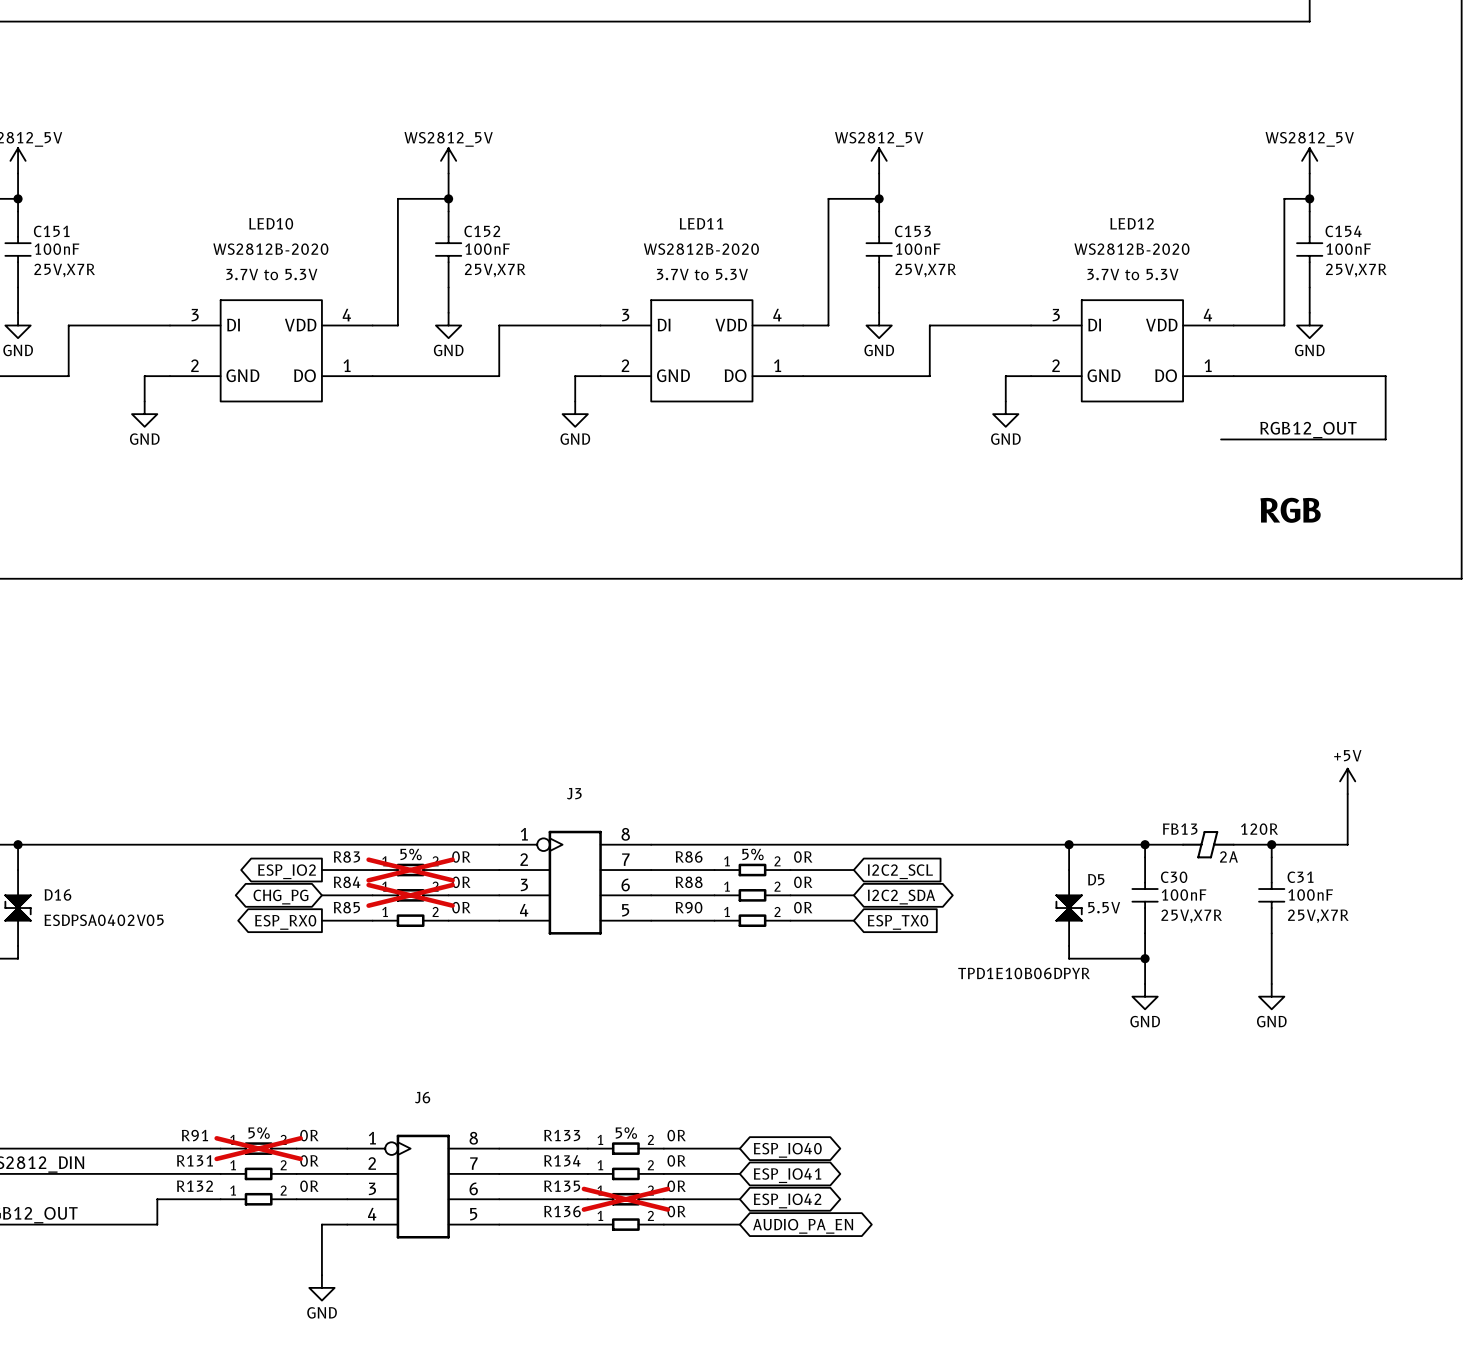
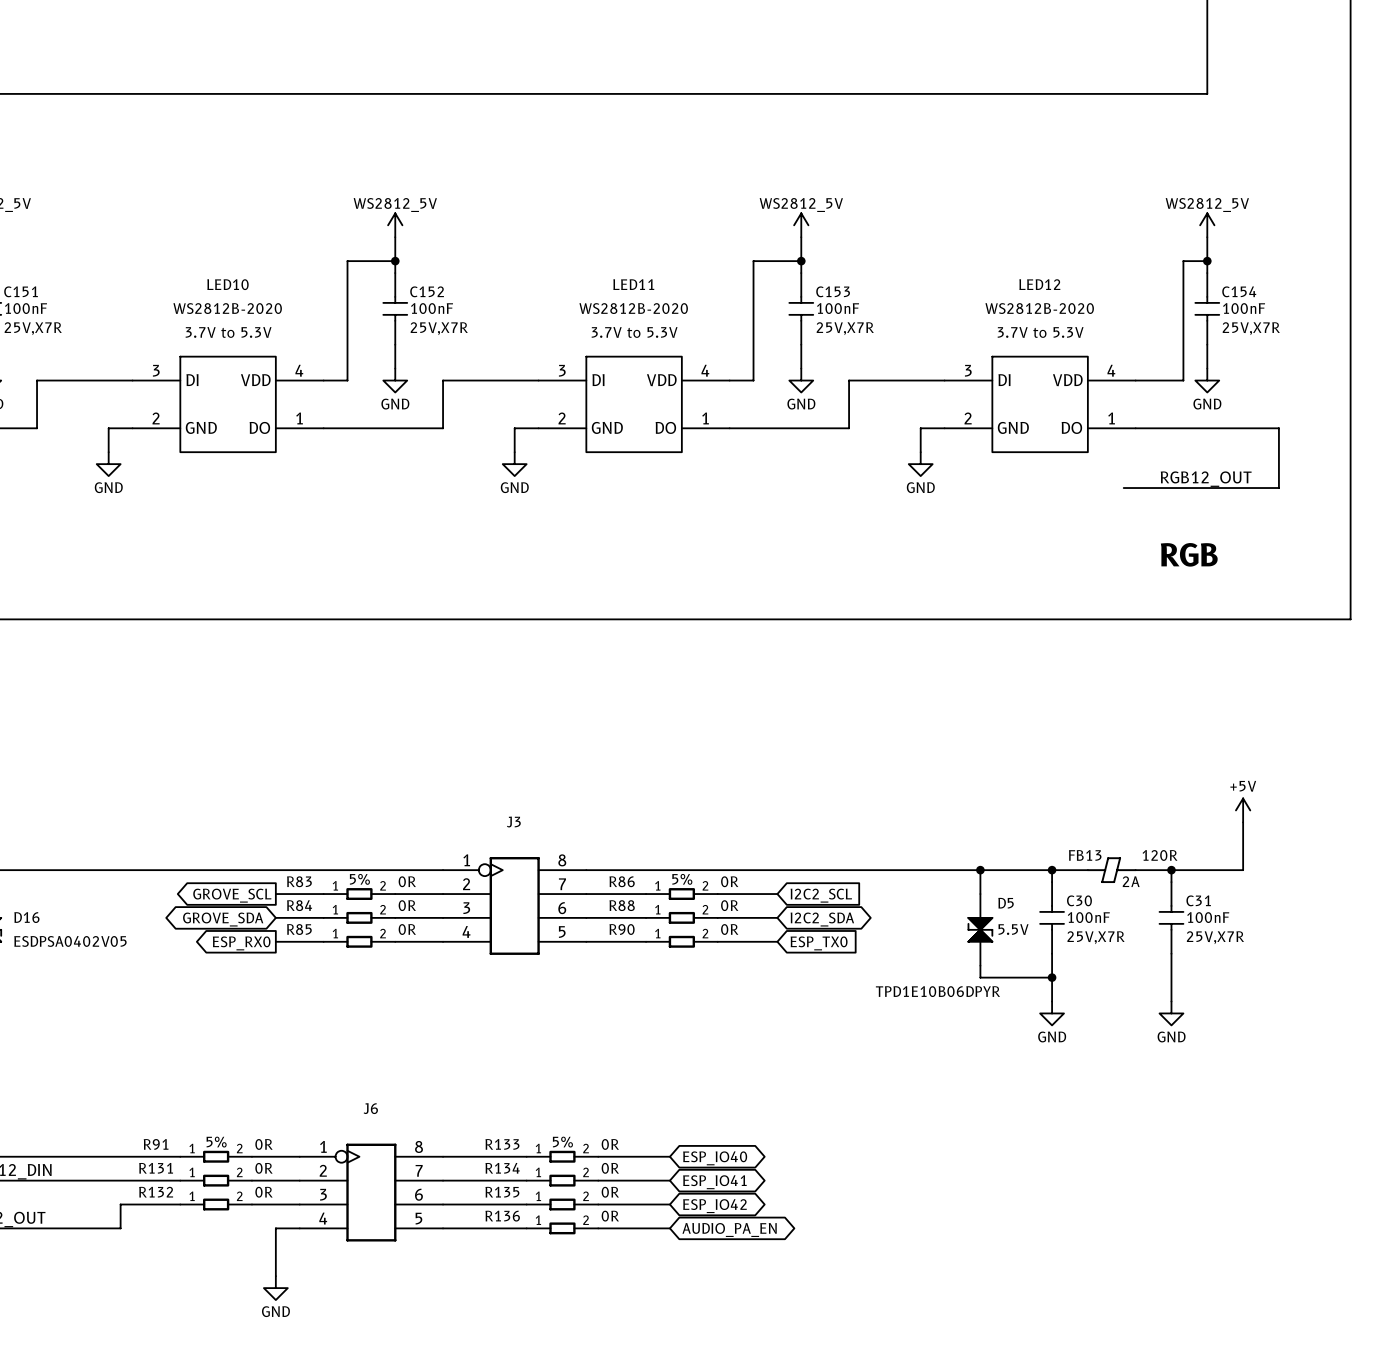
R83 do-not-place cross: (410, 870) -> none
global label: ESP_IO2 (287, 871) -> GROVE_SCL (232, 895)
R84 do-not-place cross: (410, 895) -> none
global label: CHG_PG (280, 897) -> GROVE_SDA (223, 919)
R91 do-not-place cross: (258, 1148) -> none
R135 do-not-place cross: (625, 1199) -> none

